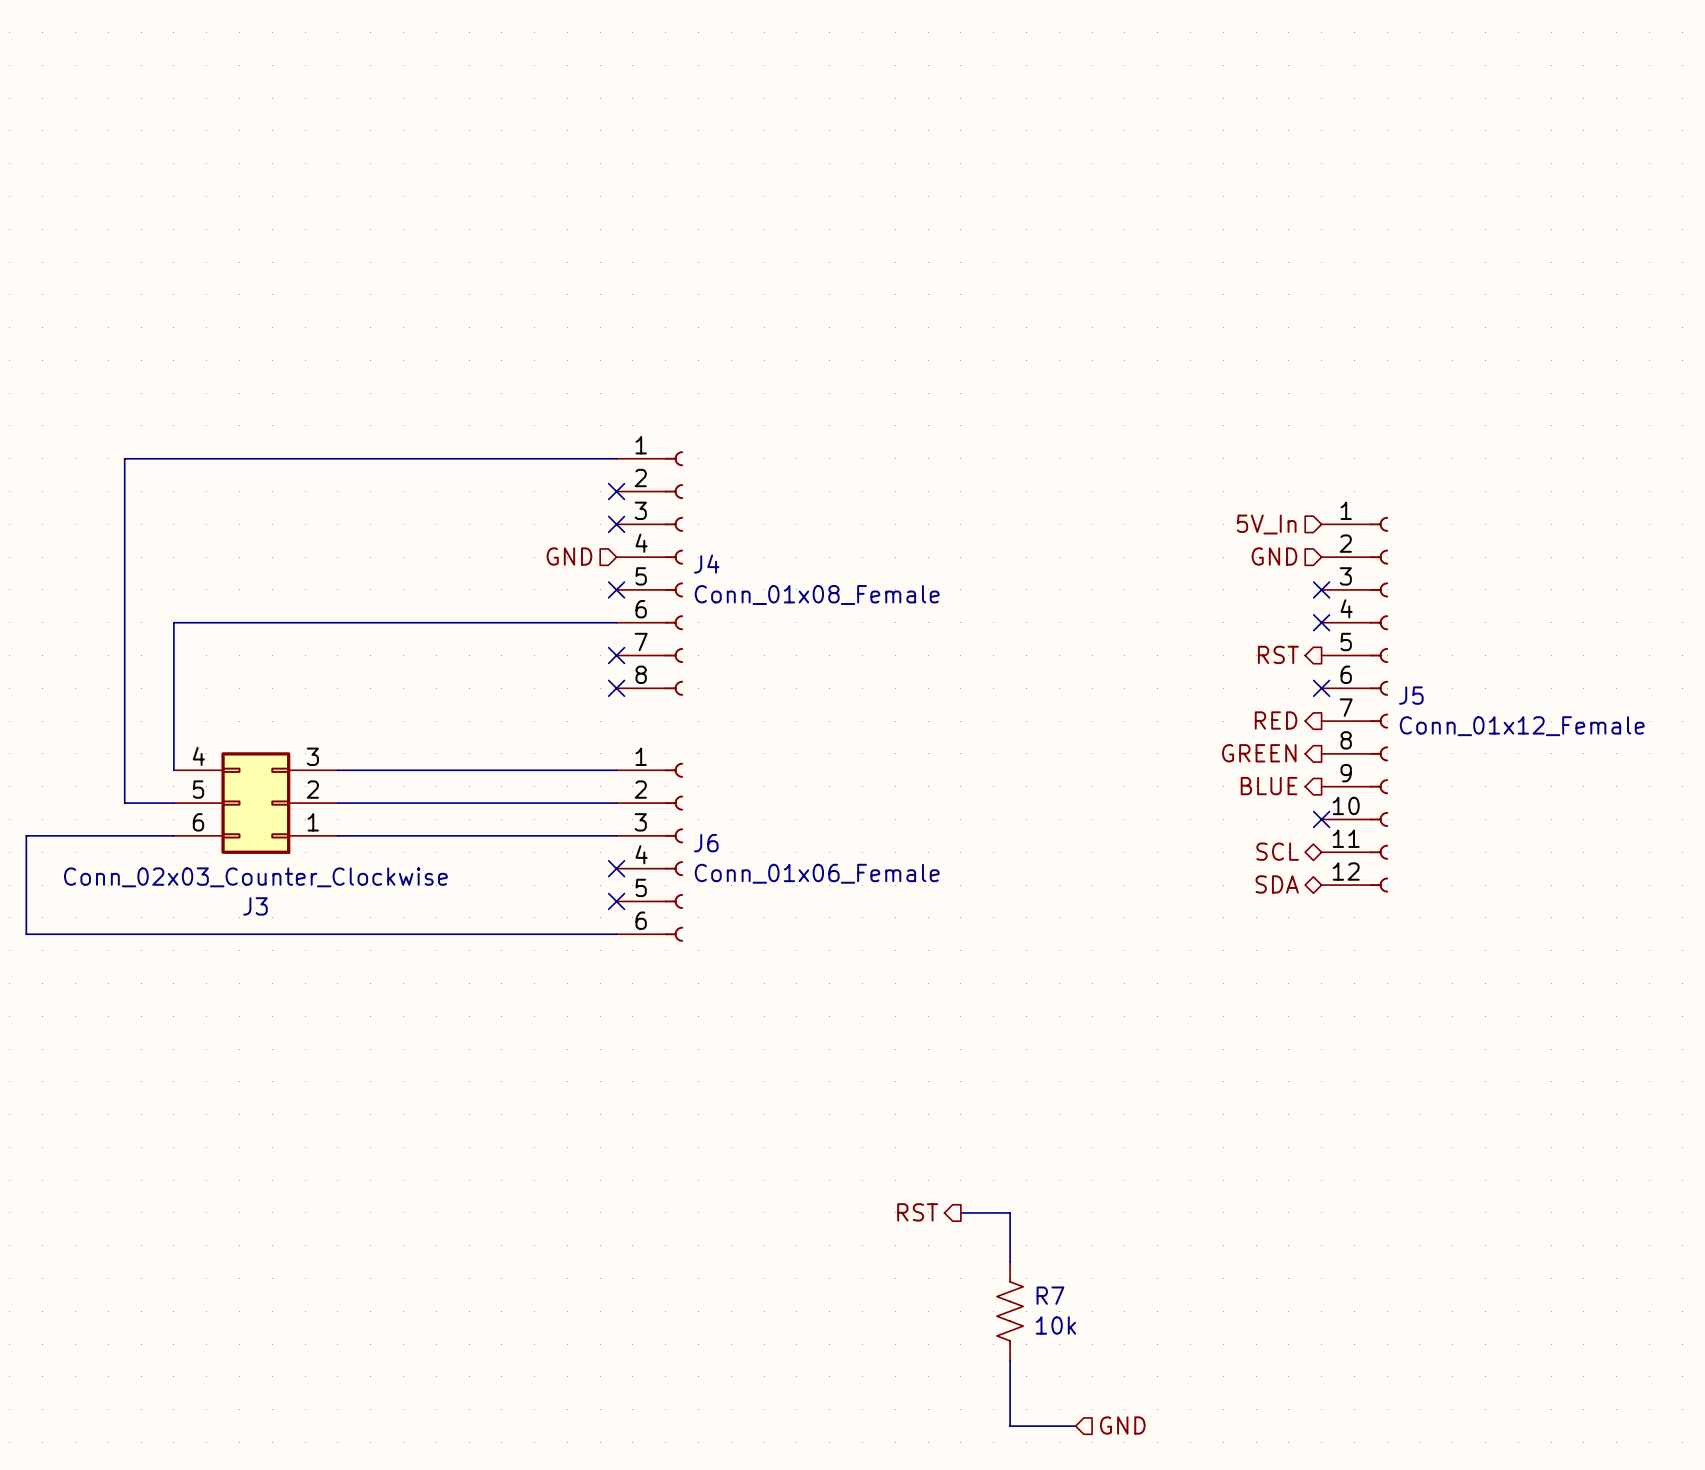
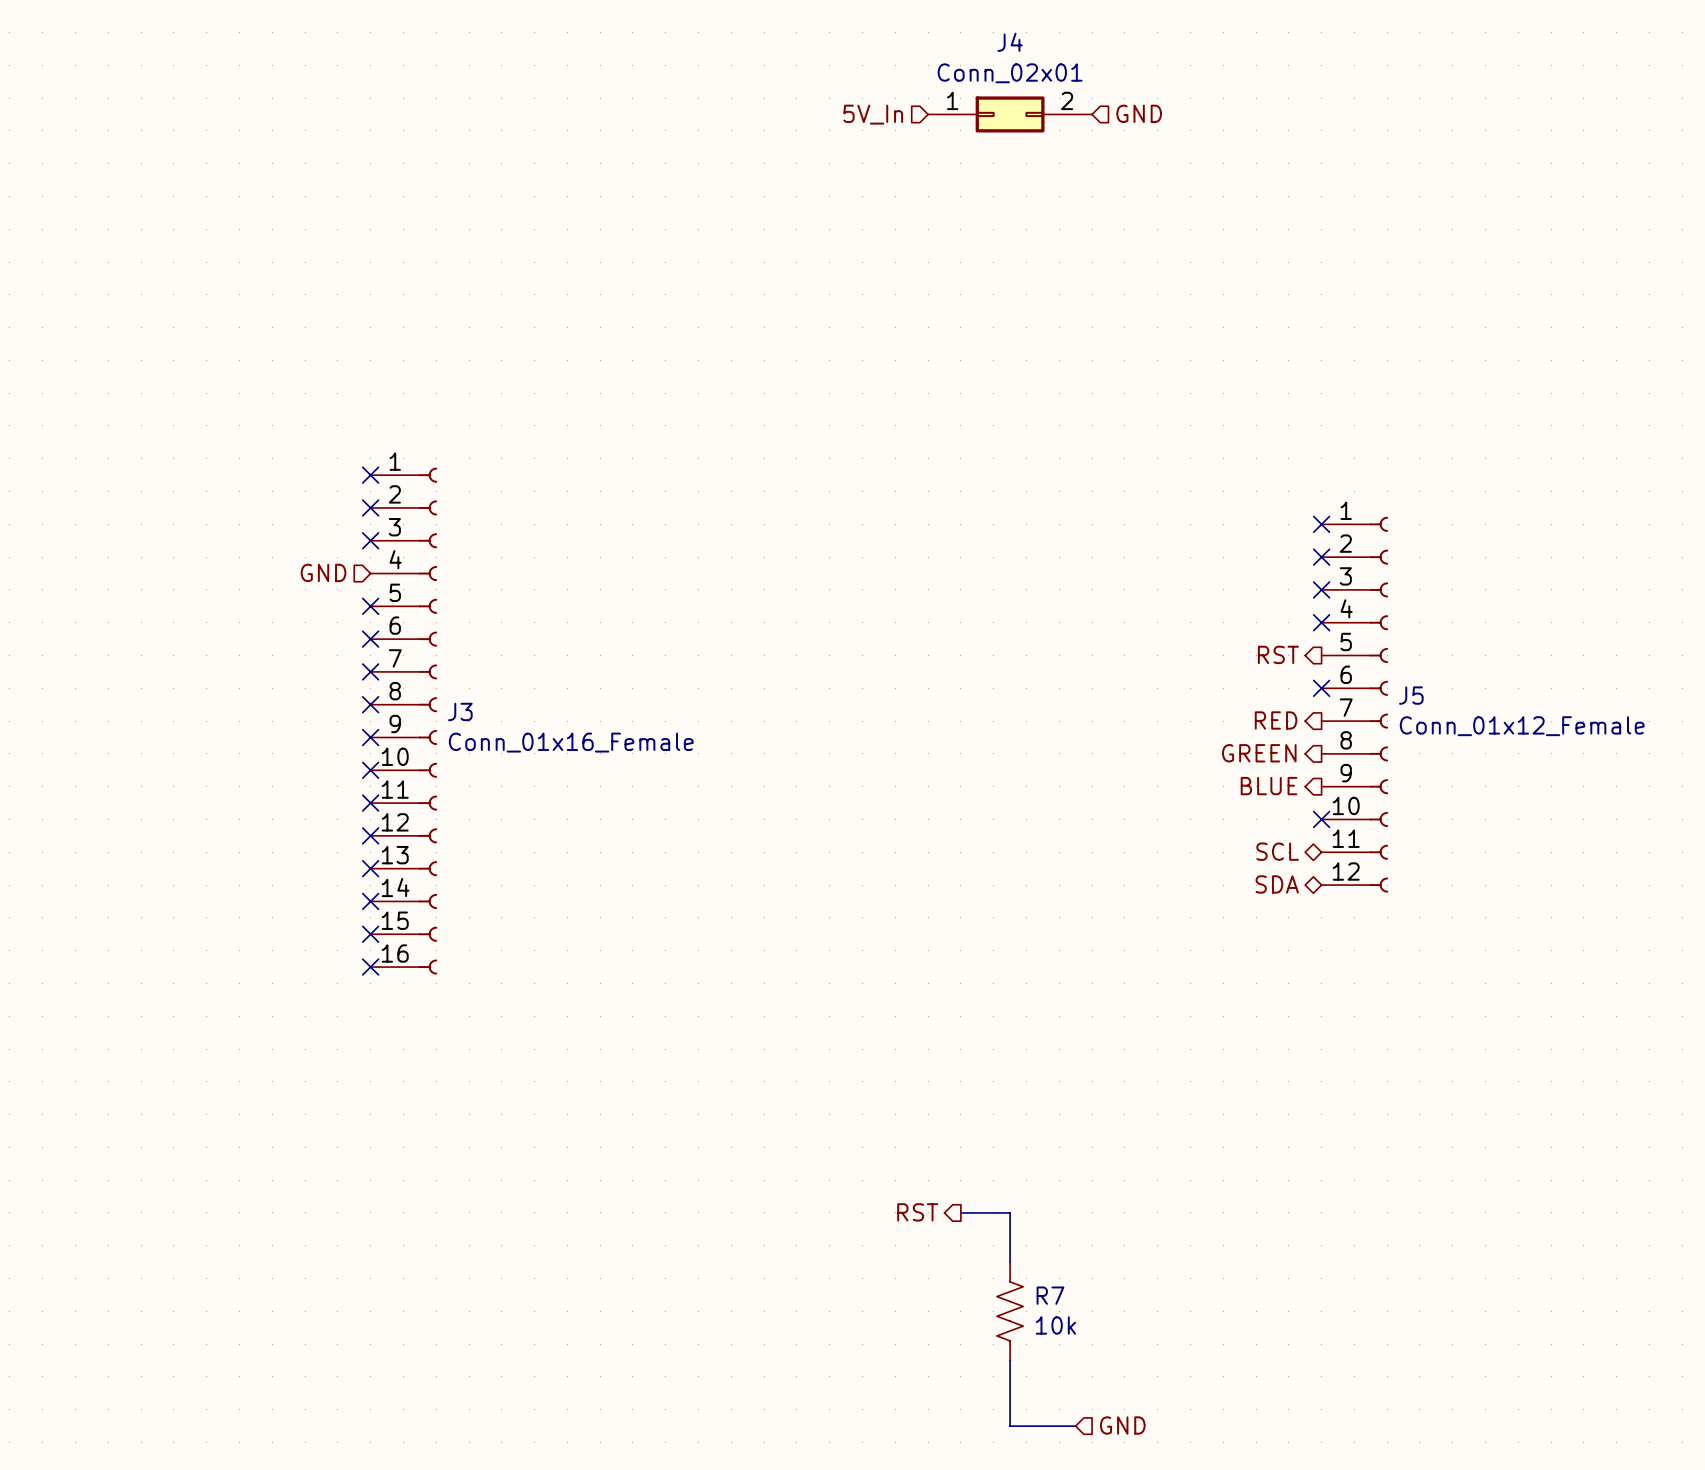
hierarchical label: none -> GND (1139, 113)
hierarchical label: none -> 5V_In (873, 114)
J4 symbol: [616, 451, 684, 696] -> [928, 96, 1093, 133]
wire: (616, 458) (124, 458) (124, 803) (173, 803) -> none
no-connect mark: none -> (370, 475)
no-connect mark: (616, 491) -> none
no-connect mark: none -> (370, 507)
no-connect mark: (616, 524) -> none
hierarchical label: 5V_In (1266, 524) -> none
no-connect mark: none -> (1321, 524)
no-connect mark: none -> (370, 540)
hierarchical label position: GND (569, 556) -> GND (323, 572)
hierarchical label: GND (1274, 556) -> none
no-connect mark: none -> (1321, 557)
J4 name position: J4 (706, 564) -> J4 (1010, 42)
no-connect mark: (616, 589) -> none
J4 value: Conn_01x08_Female (817, 595) -> Conn_02x01 (1010, 73)
no-connect mark: none -> (370, 606)
wire: (616, 622) (173, 622) (173, 770) -> none
no-connect mark: none -> (370, 639)
no-connect mark: (616, 655) -> none
no-connect mark: none -> (370, 671)
no-connect mark: (616, 688) -> none
no-connect mark: none -> (370, 704)
no-connect mark: none -> (370, 737)
J3 symbol: [173, 752, 338, 854] -> [370, 467, 438, 975]
wire: (337, 770) (616, 770) -> none
no-connect mark: none -> (370, 770)
wire: (337, 803) (616, 803) -> none
no-connect mark: none -> (370, 803)
wire: (173, 835) (26, 835) (26, 934) (616, 934) -> none
wire: (337, 835) (616, 835) -> none
no-connect mark: none -> (370, 835)
J6: Conn_01x06_Female (649, 852) -> none
no-connect mark: none -> (370, 868)
no-connect mark: (616, 868) -> none
J3 value: Conn_02x03_Counter_Clockwise (255, 877) -> Conn_01x16_Female (571, 742)
no-connect mark: none -> (370, 901)
no-connect mark: (616, 901) -> none
J3 name position: J3 (255, 906) -> J3 (460, 711)
no-connect mark: none -> (370, 934)
no-connect mark: none -> (370, 967)

